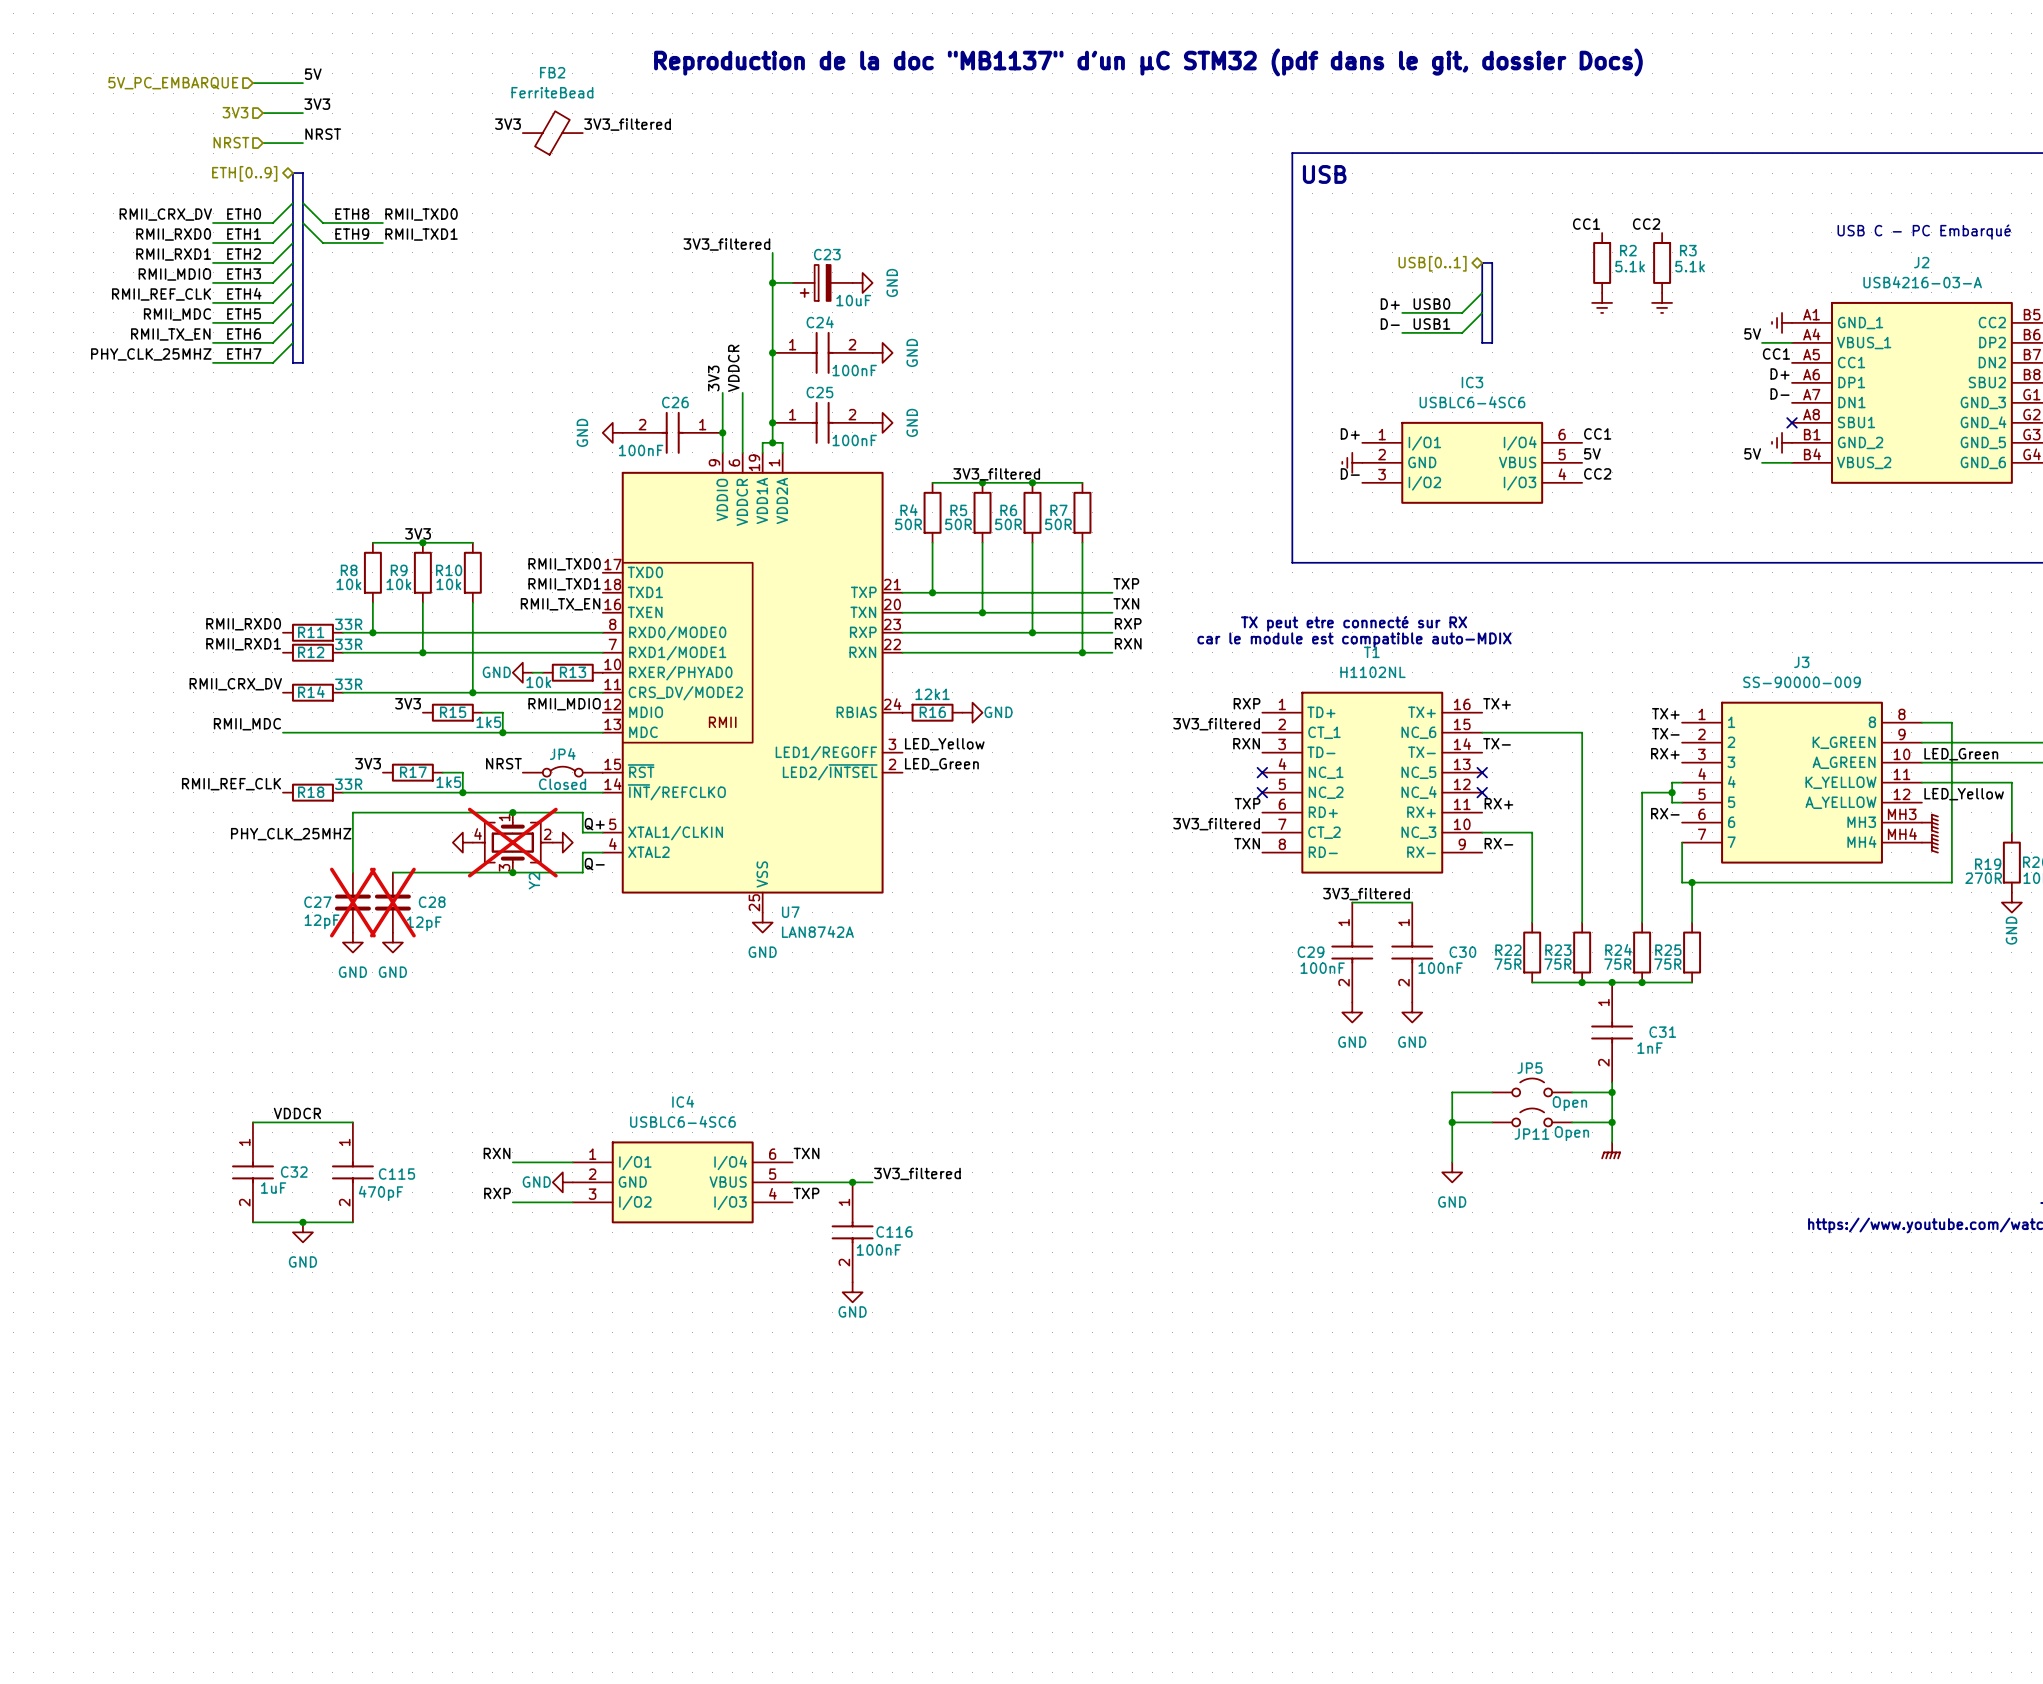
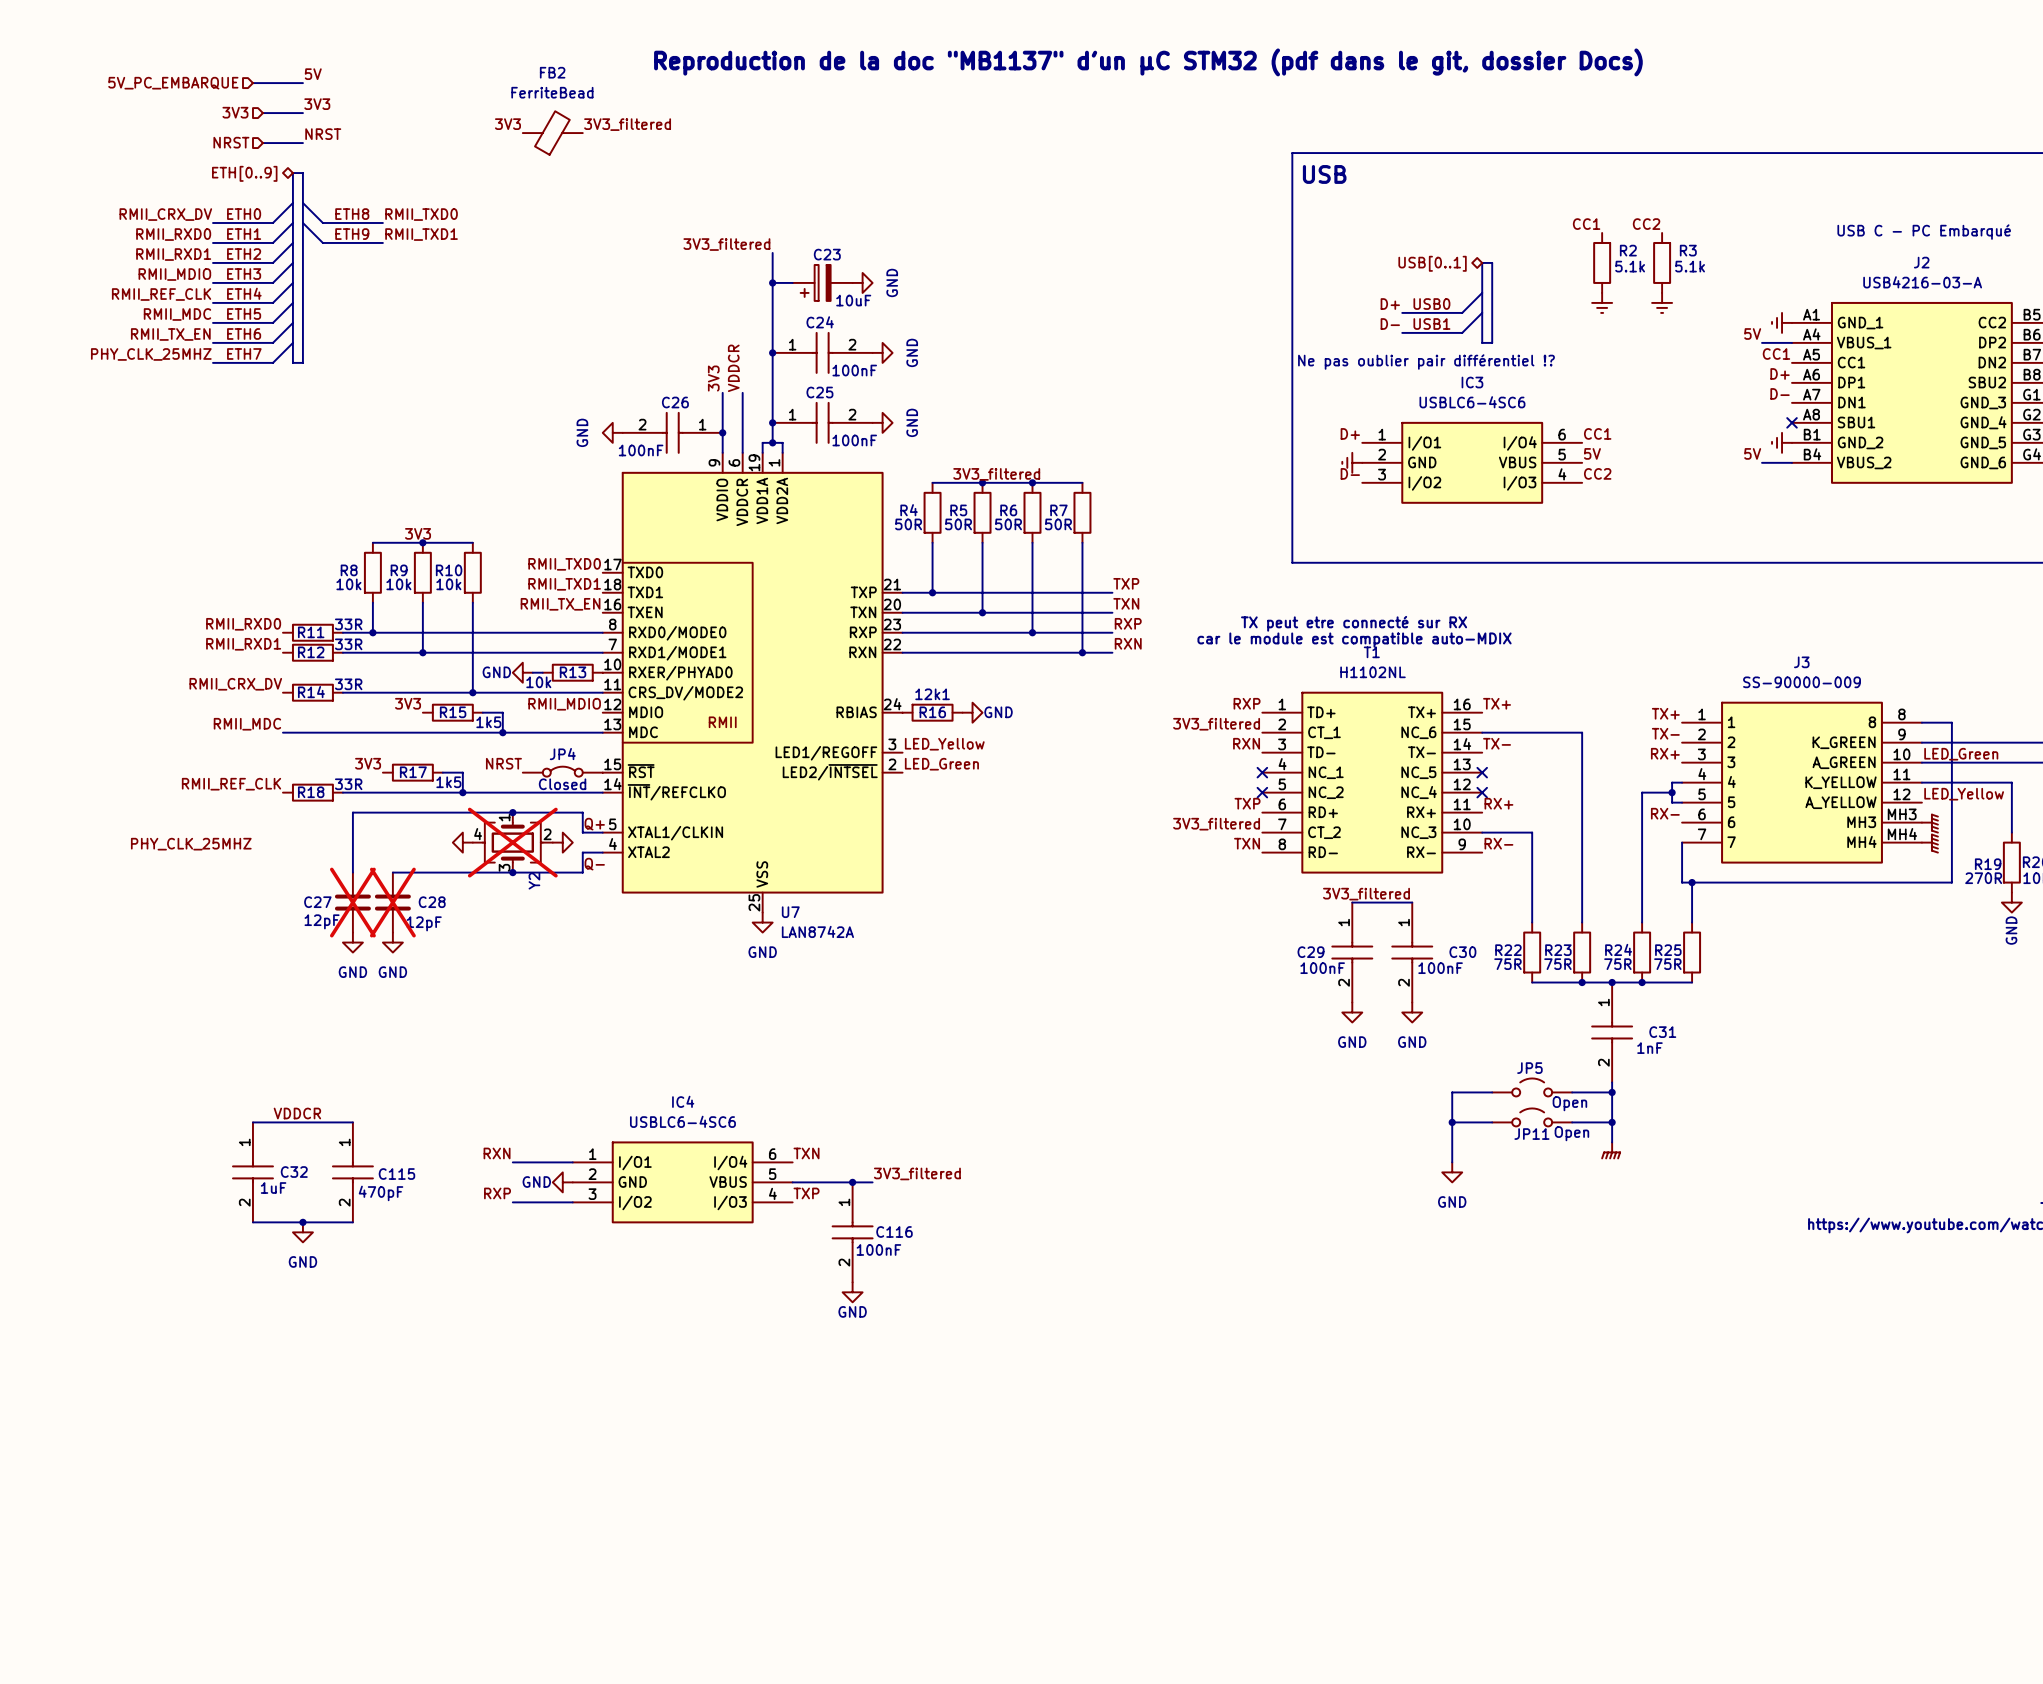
text: none -> Ne pas oublier pair différentiel !? (1426, 361)
label position: PHY_CLK_25MHZ (291, 834) -> PHY_CLK_25MHZ (191, 844)

